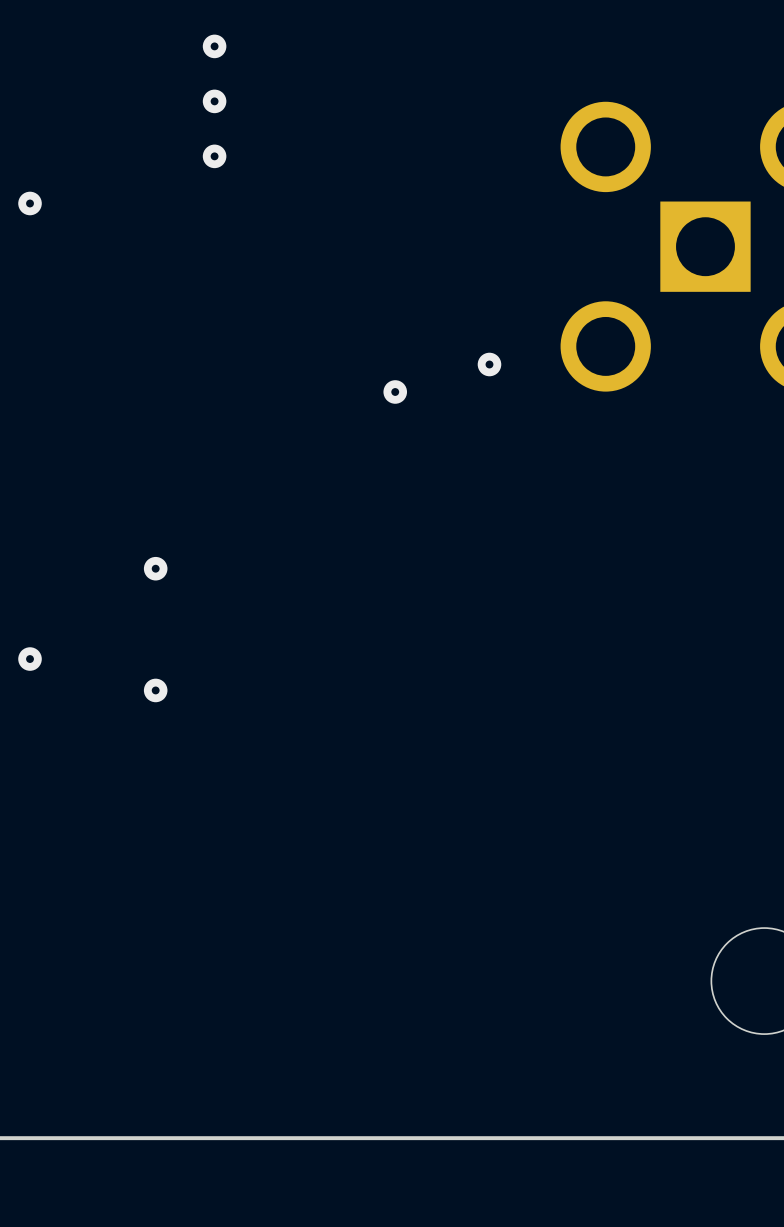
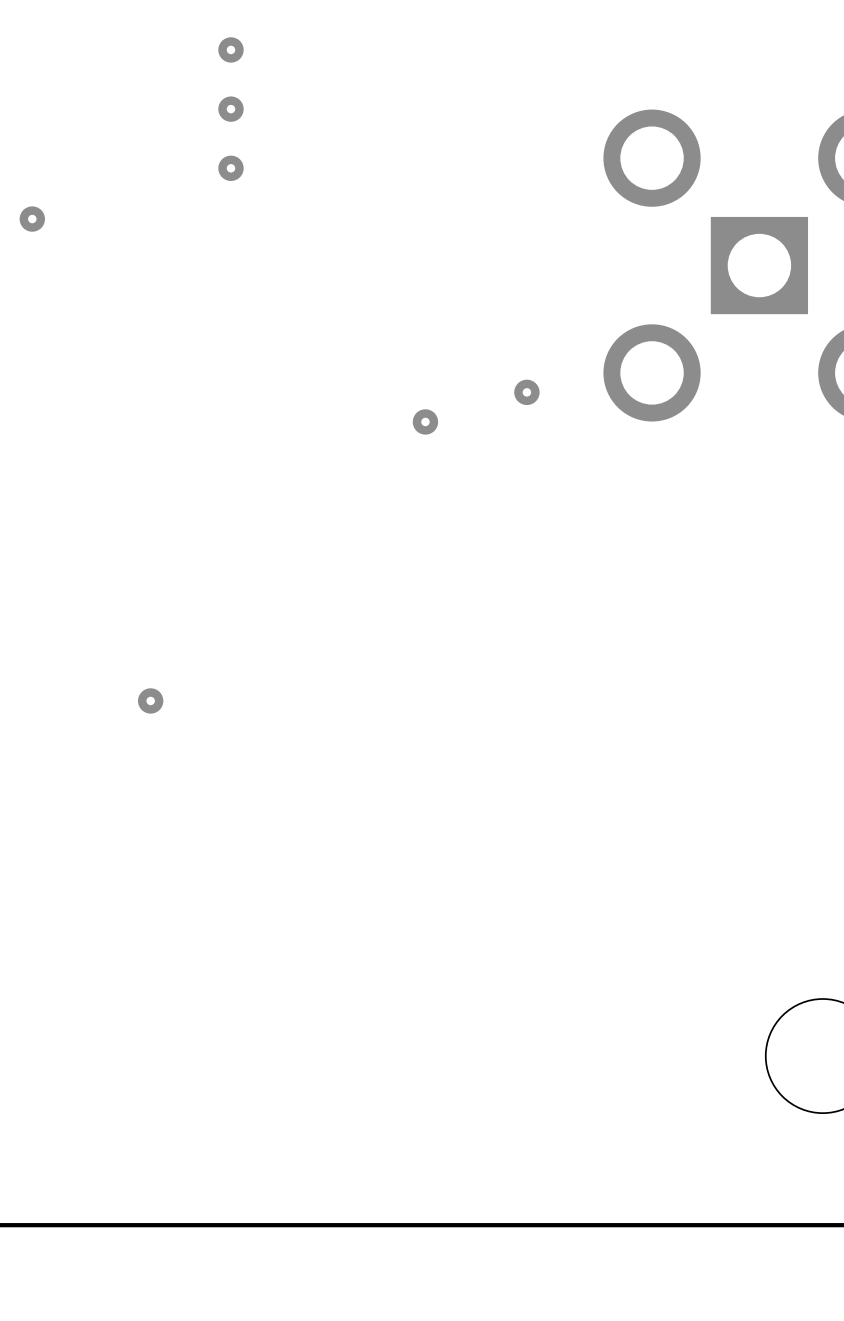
via: (155, 568) -> none
via: none -> (150, 700)
via: (30, 659) -> none
via: (155, 690) -> none

